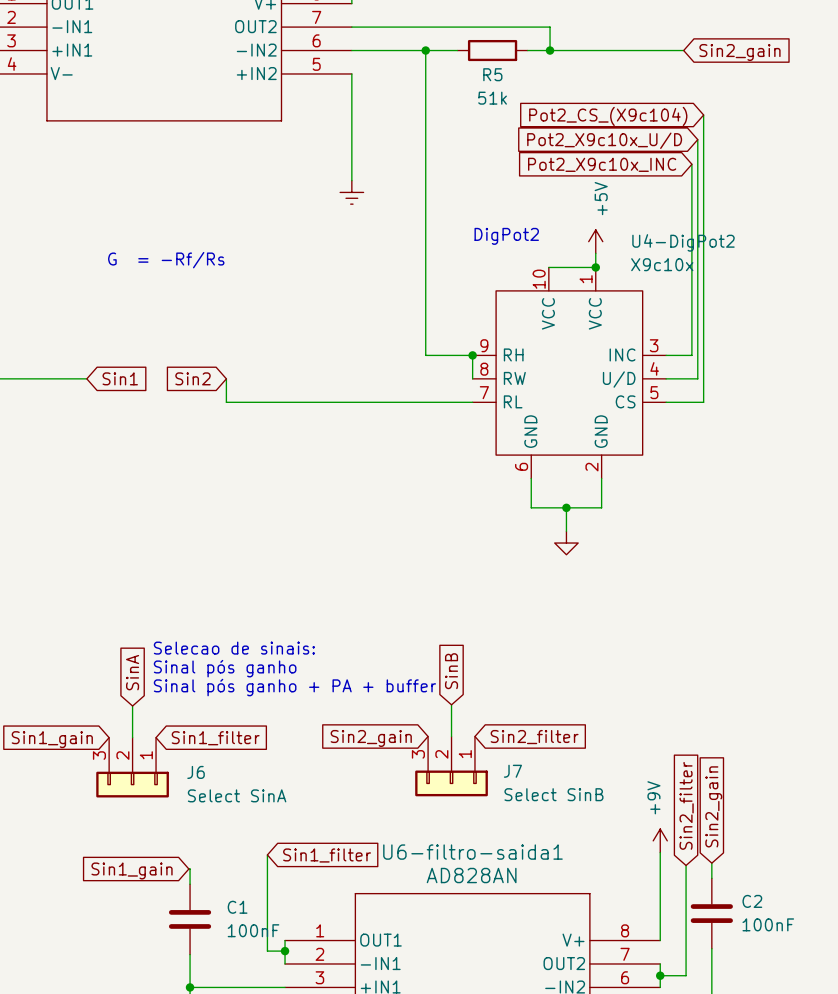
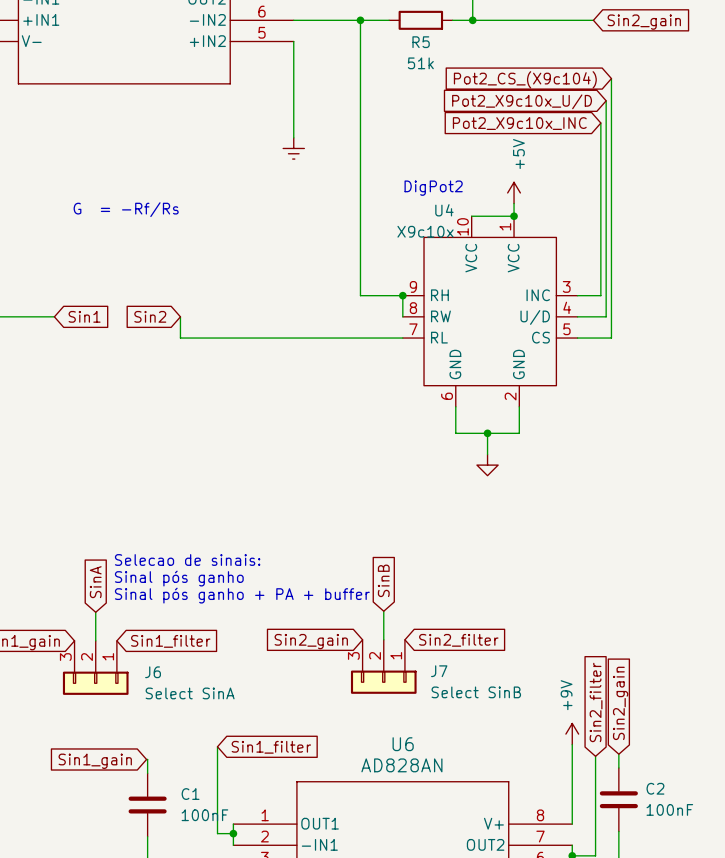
U4-DigPot2 name: U4-DigPot2 (683, 242) -> U4 (444, 210)
U4-DigPot2 value position: X9c10x (662, 264) -> X9c10x (425, 231)
U6-filtro-saida1 name: U6-filtro-saida1 (472, 852) -> U6 (403, 744)

